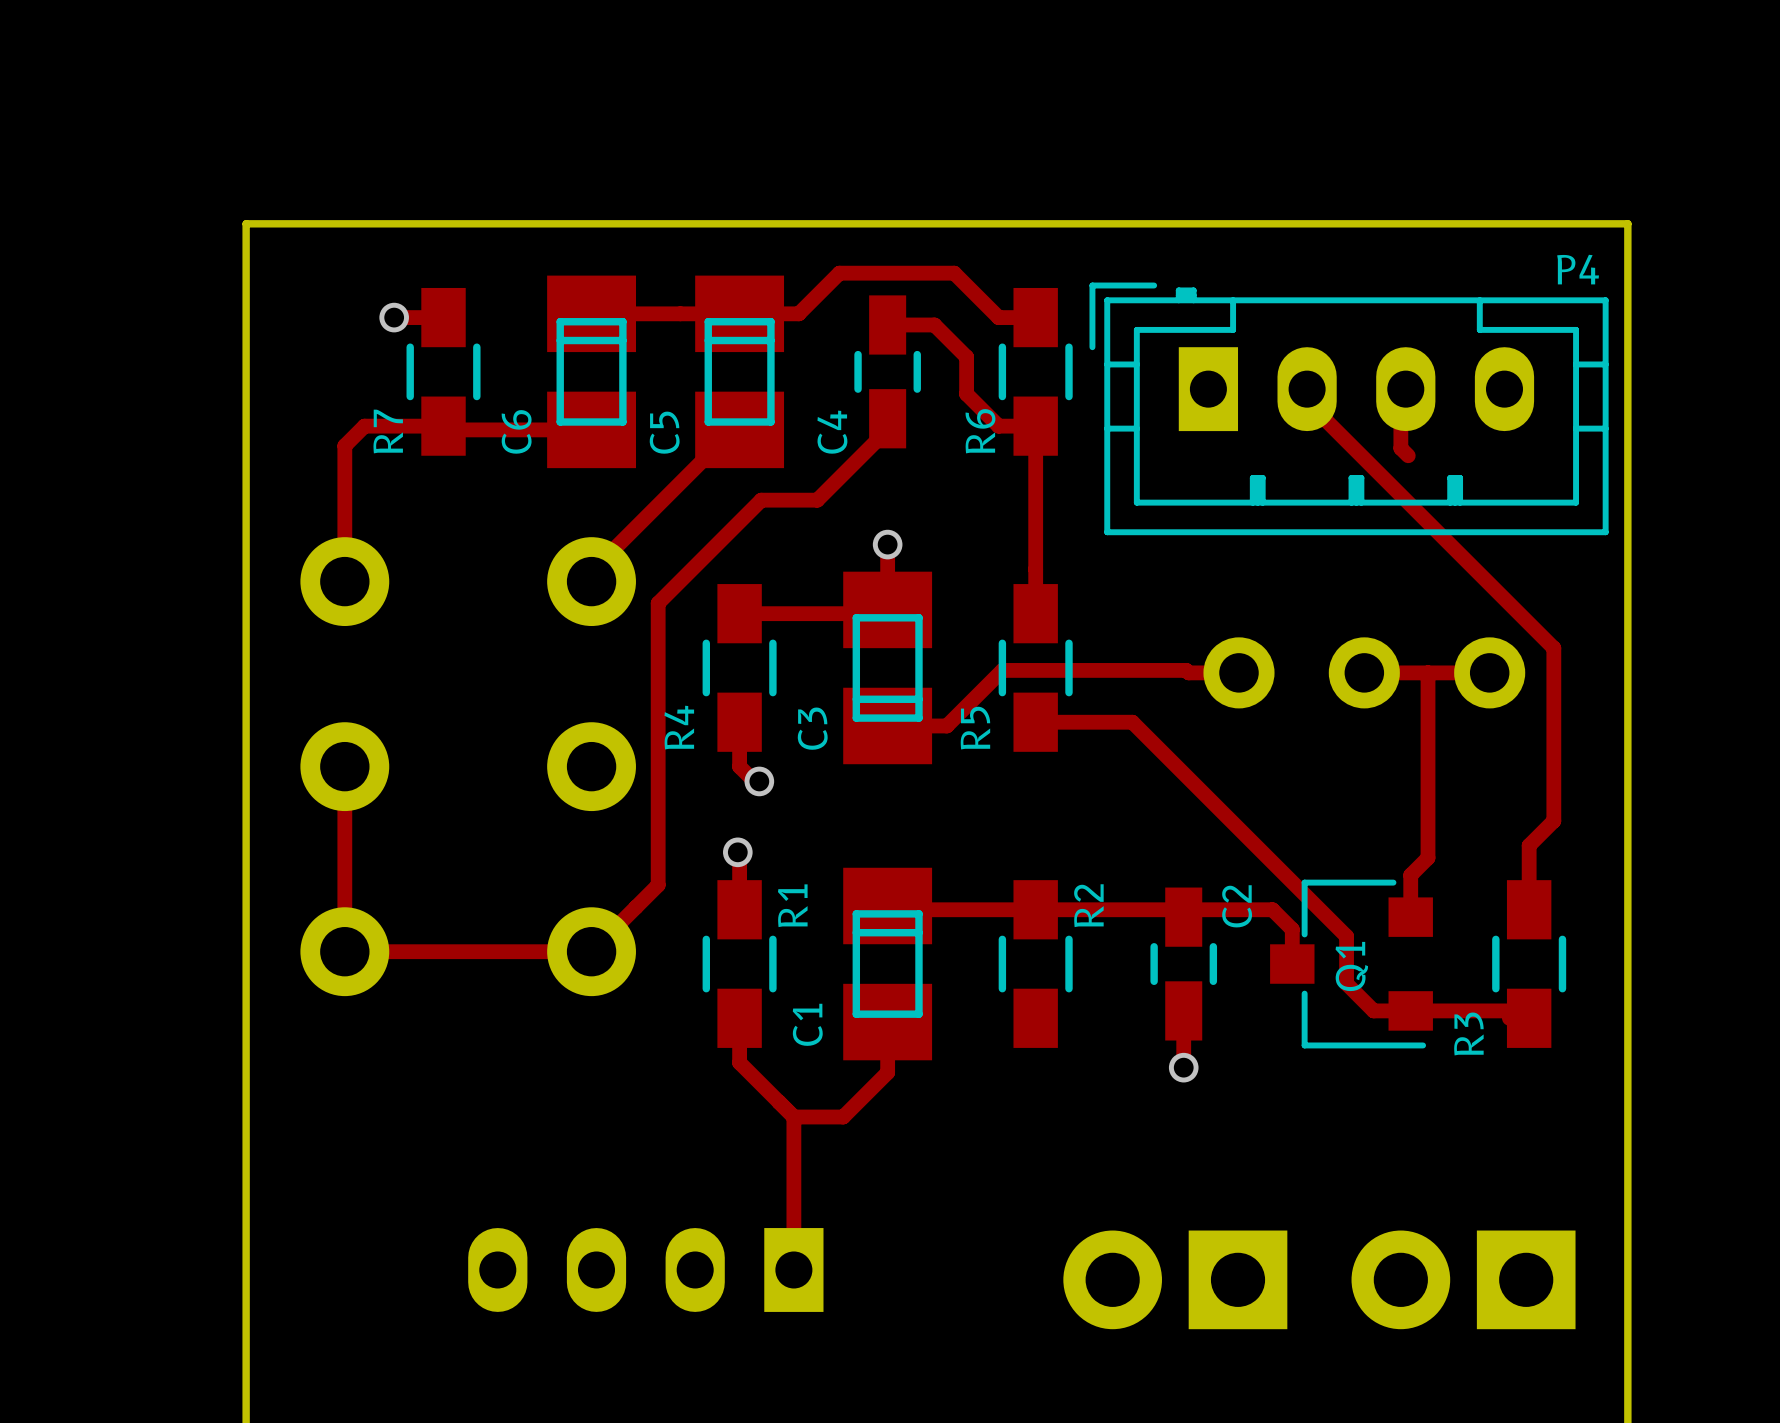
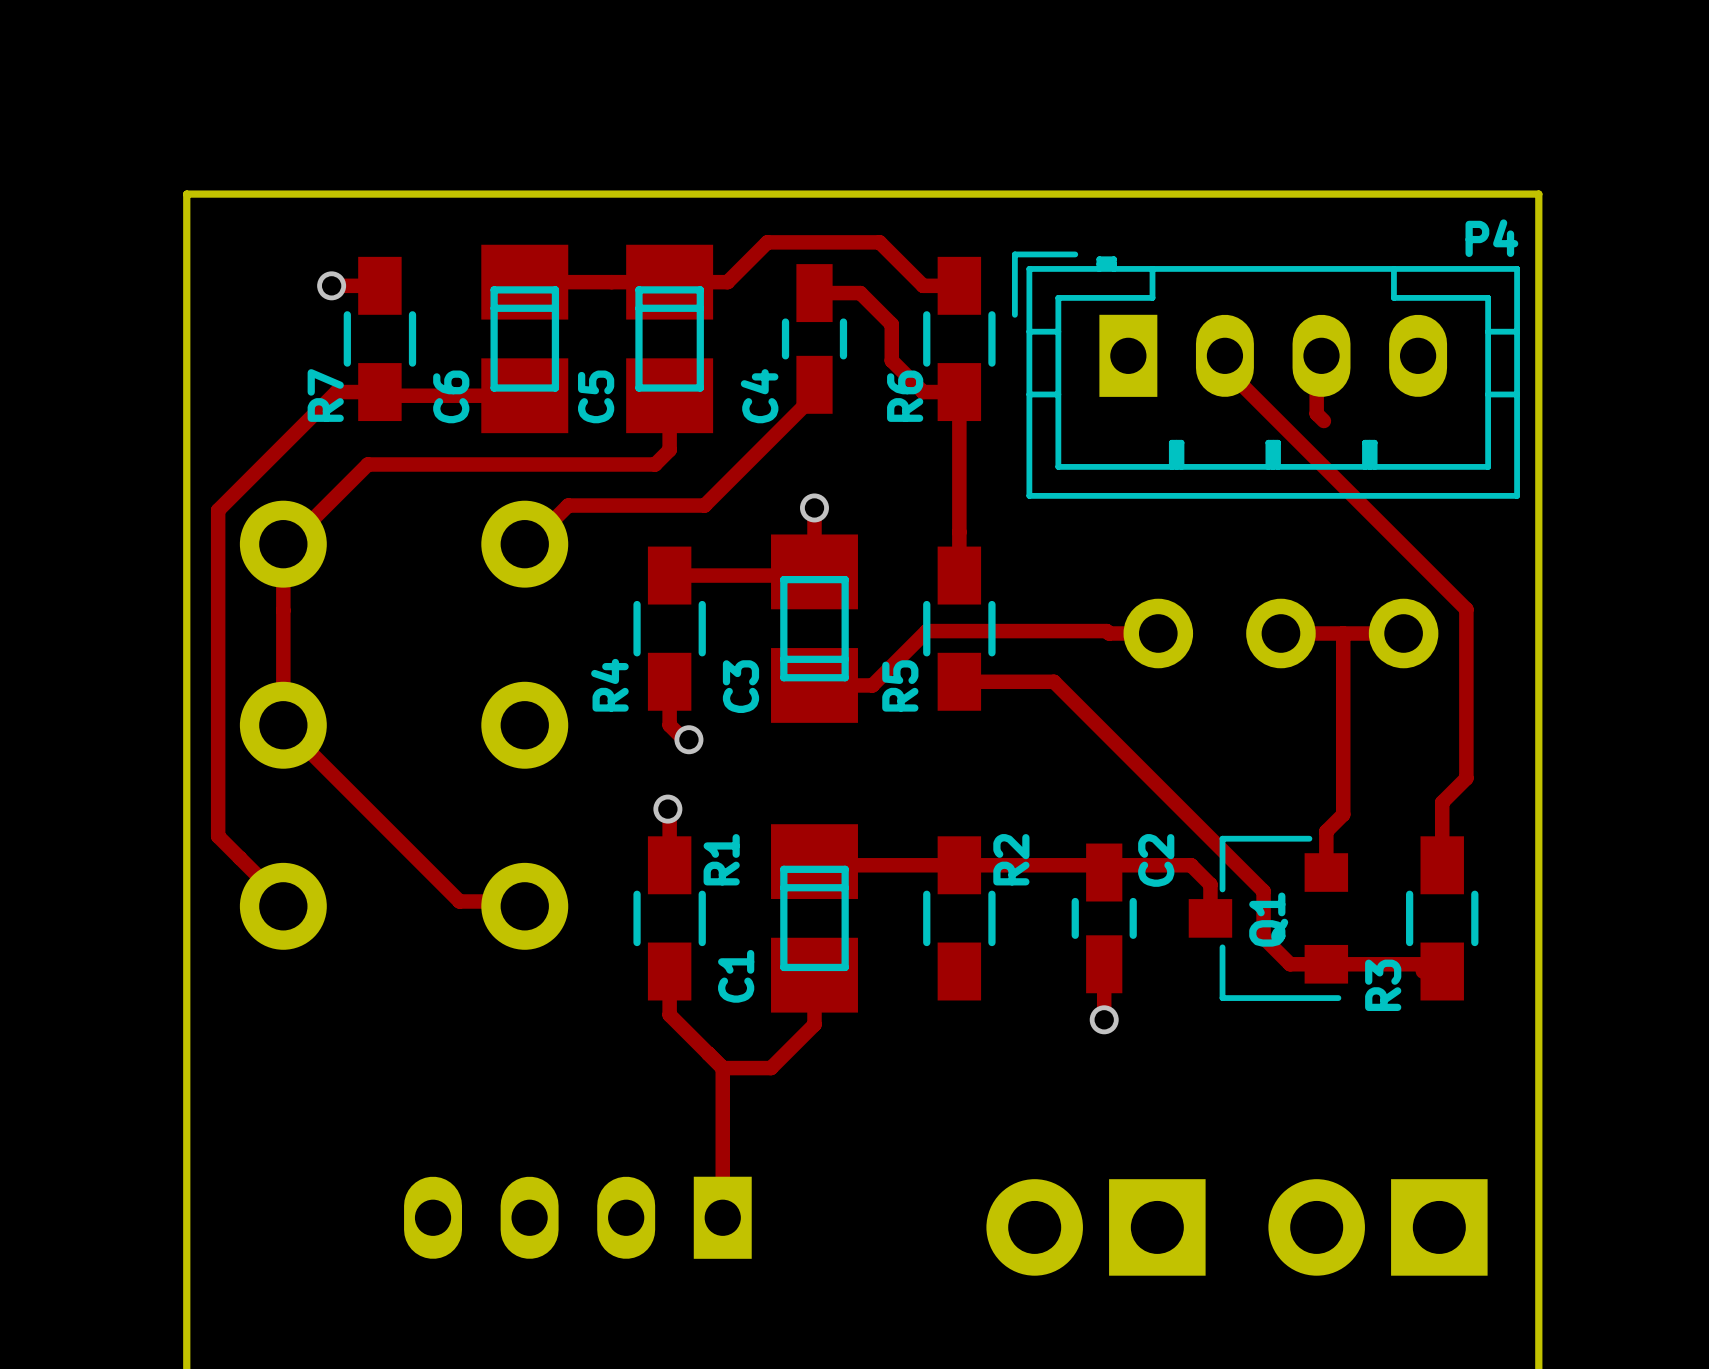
track: (399, 426) (364, 426) (344, 445) (344, 581) -> (336, 392) (218, 510) (218, 836) (283, 901)
track: (739, 429) (733, 429) (591, 571) (591, 581) -> (669, 395) (669, 450) (655, 464) (367, 464) (283, 549) (283, 725) (459, 901) (524, 901)
track: (817, 500) (761, 500) (658, 603) (658, 885) (591, 951) (344, 951) (344, 766) -> (745, 464) (704, 505) (568, 505) (524, 549)

